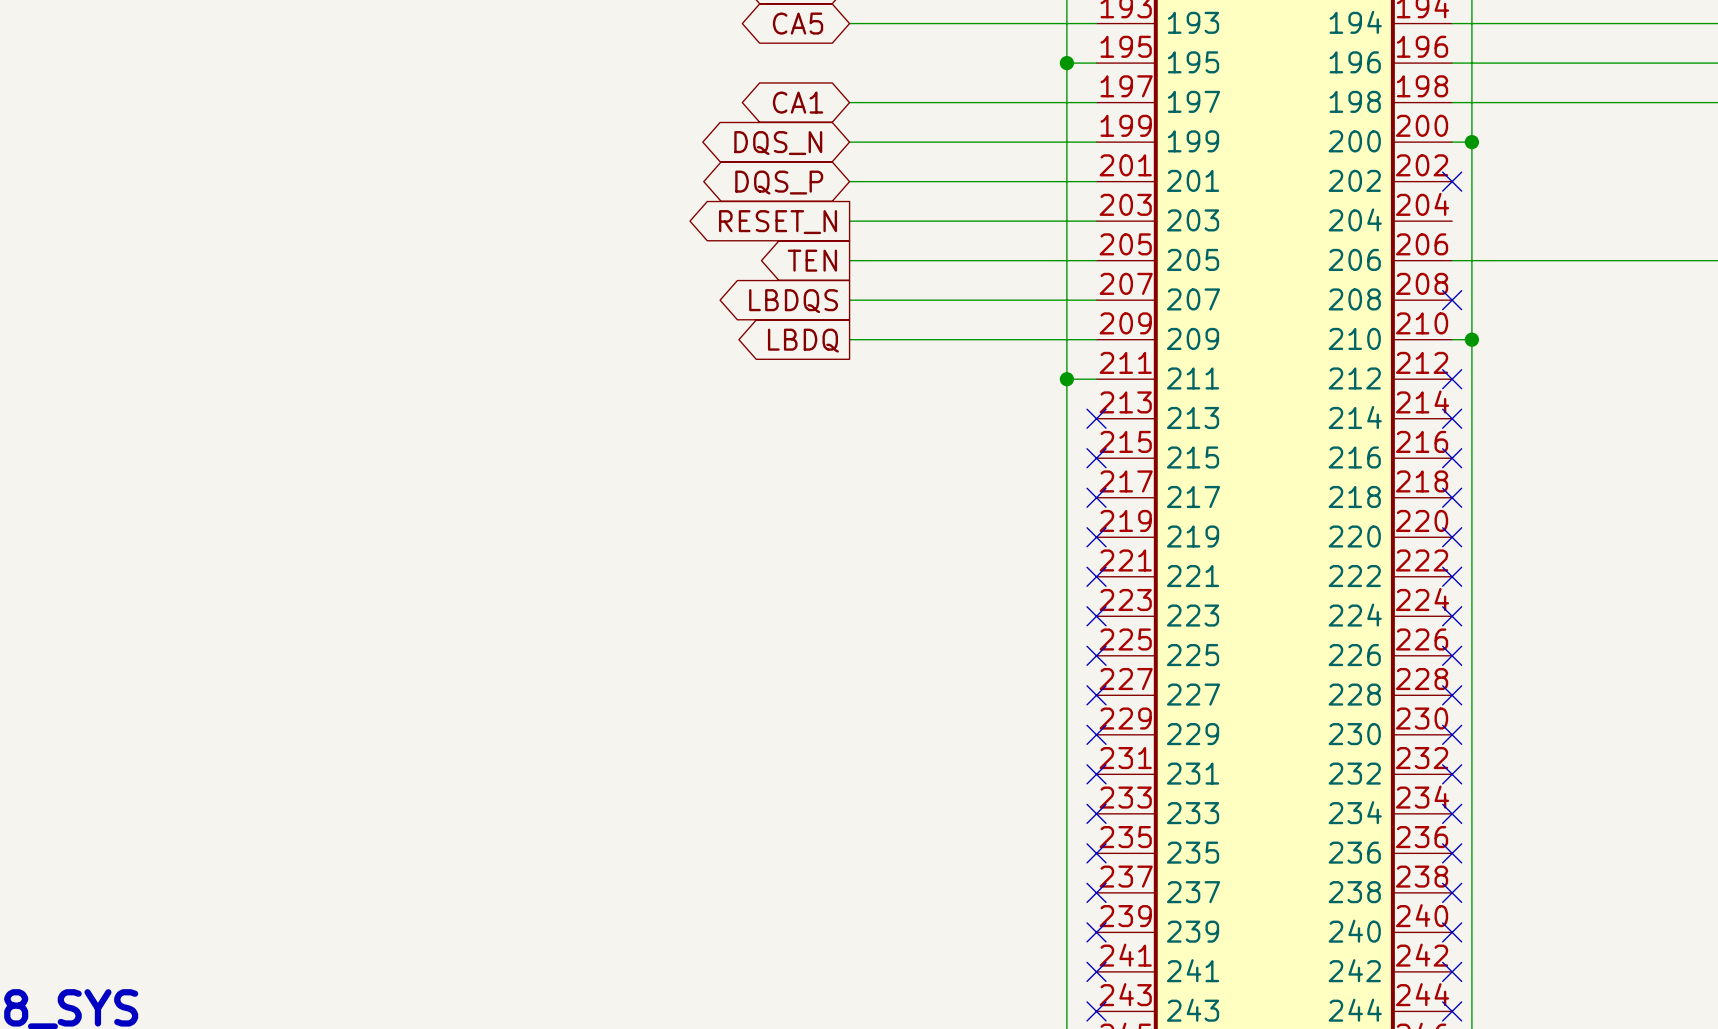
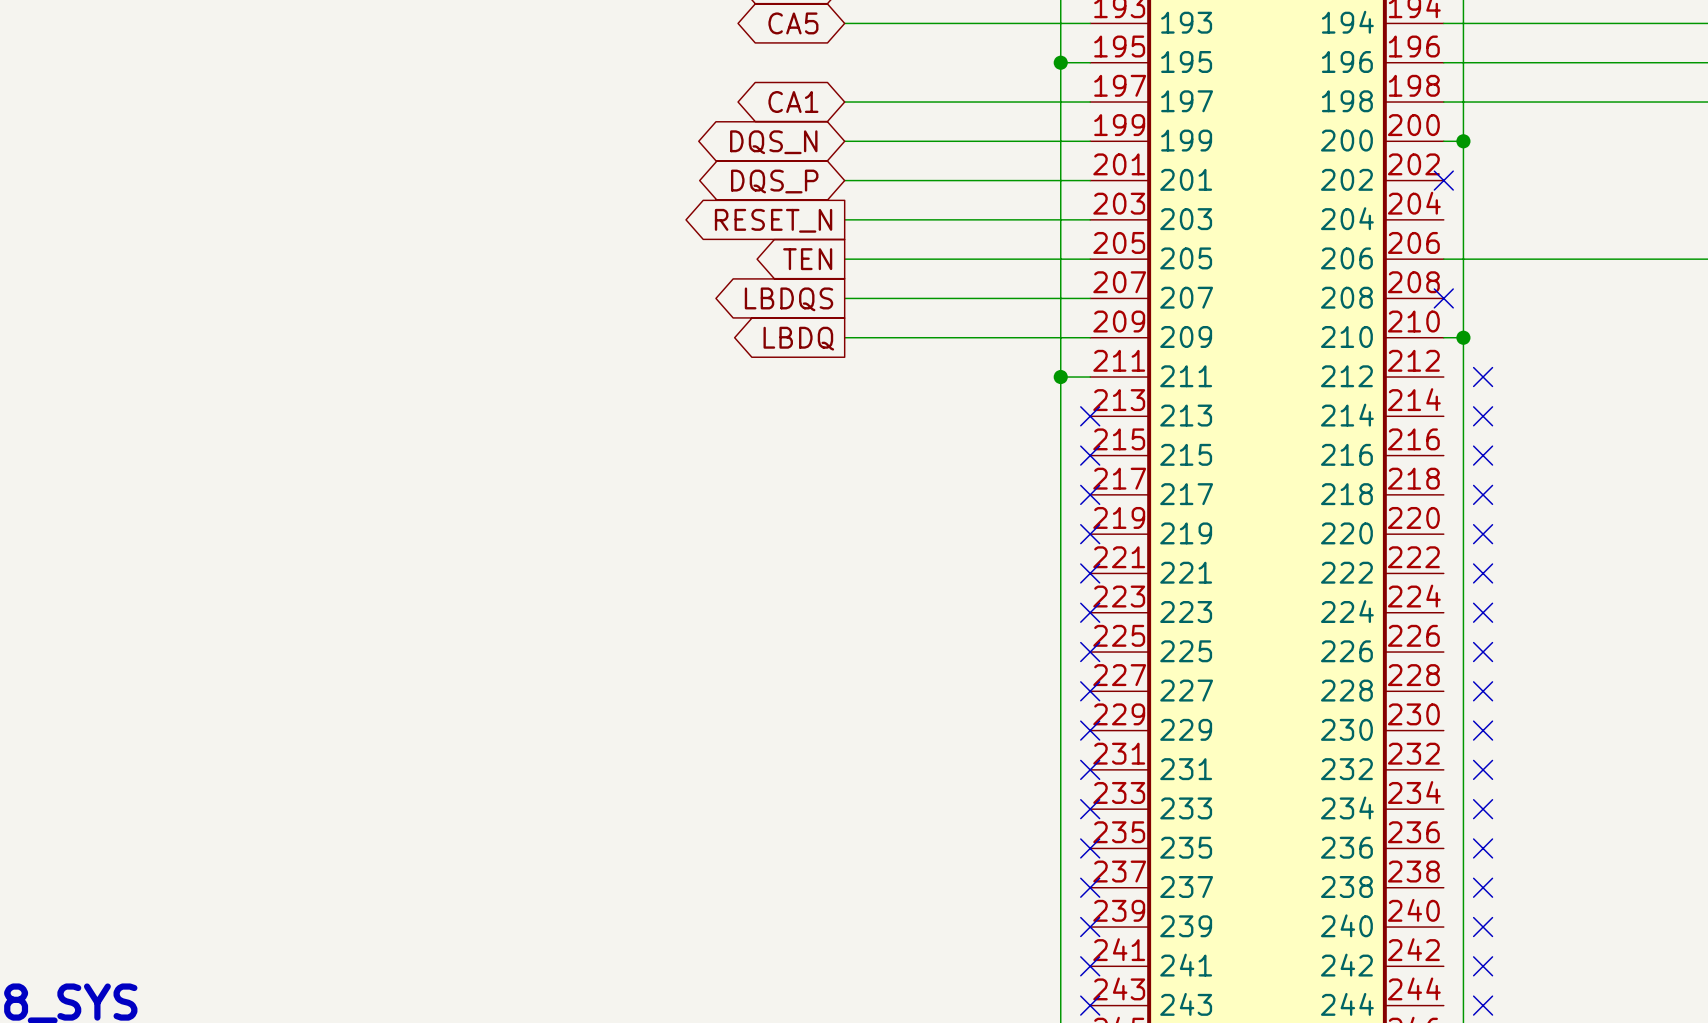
no-connect mark: (1452, 379) -> none
no-connect mark: none -> (1483, 377)
no-connect mark: (1452, 418) -> none
no-connect mark: none -> (1483, 416)
no-connect mark: (1452, 458) -> none
no-connect mark: none -> (1483, 455)
no-connect mark: (1452, 497) -> none
no-connect mark: none -> (1483, 494)
no-connect mark: (1452, 537) -> none
no-connect mark: none -> (1483, 534)
no-connect mark: (1452, 576) -> none
no-connect mark: none -> (1483, 573)
no-connect mark: (1452, 616) -> none
no-connect mark: none -> (1483, 612)
no-connect mark: (1452, 655) -> none
no-connect mark: none -> (1483, 652)
no-connect mark: (1452, 695) -> none
no-connect mark: none -> (1483, 691)
no-connect mark: (1452, 734) -> none
no-connect mark: none -> (1483, 730)
no-connect mark: (1452, 774) -> none
no-connect mark: none -> (1483, 769)
no-connect mark: (1452, 813) -> none
no-connect mark: none -> (1483, 809)
no-connect mark: (1452, 853) -> none
no-connect mark: none -> (1483, 848)
no-connect mark: (1452, 892) -> none
no-connect mark: none -> (1483, 887)
no-connect mark: (1452, 932) -> none
no-connect mark: none -> (1483, 927)
no-connect mark: (1452, 971) -> none
no-connect mark: none -> (1483, 966)
no-connect mark: (1452, 1011) -> none
no-connect mark: none -> (1483, 1005)

